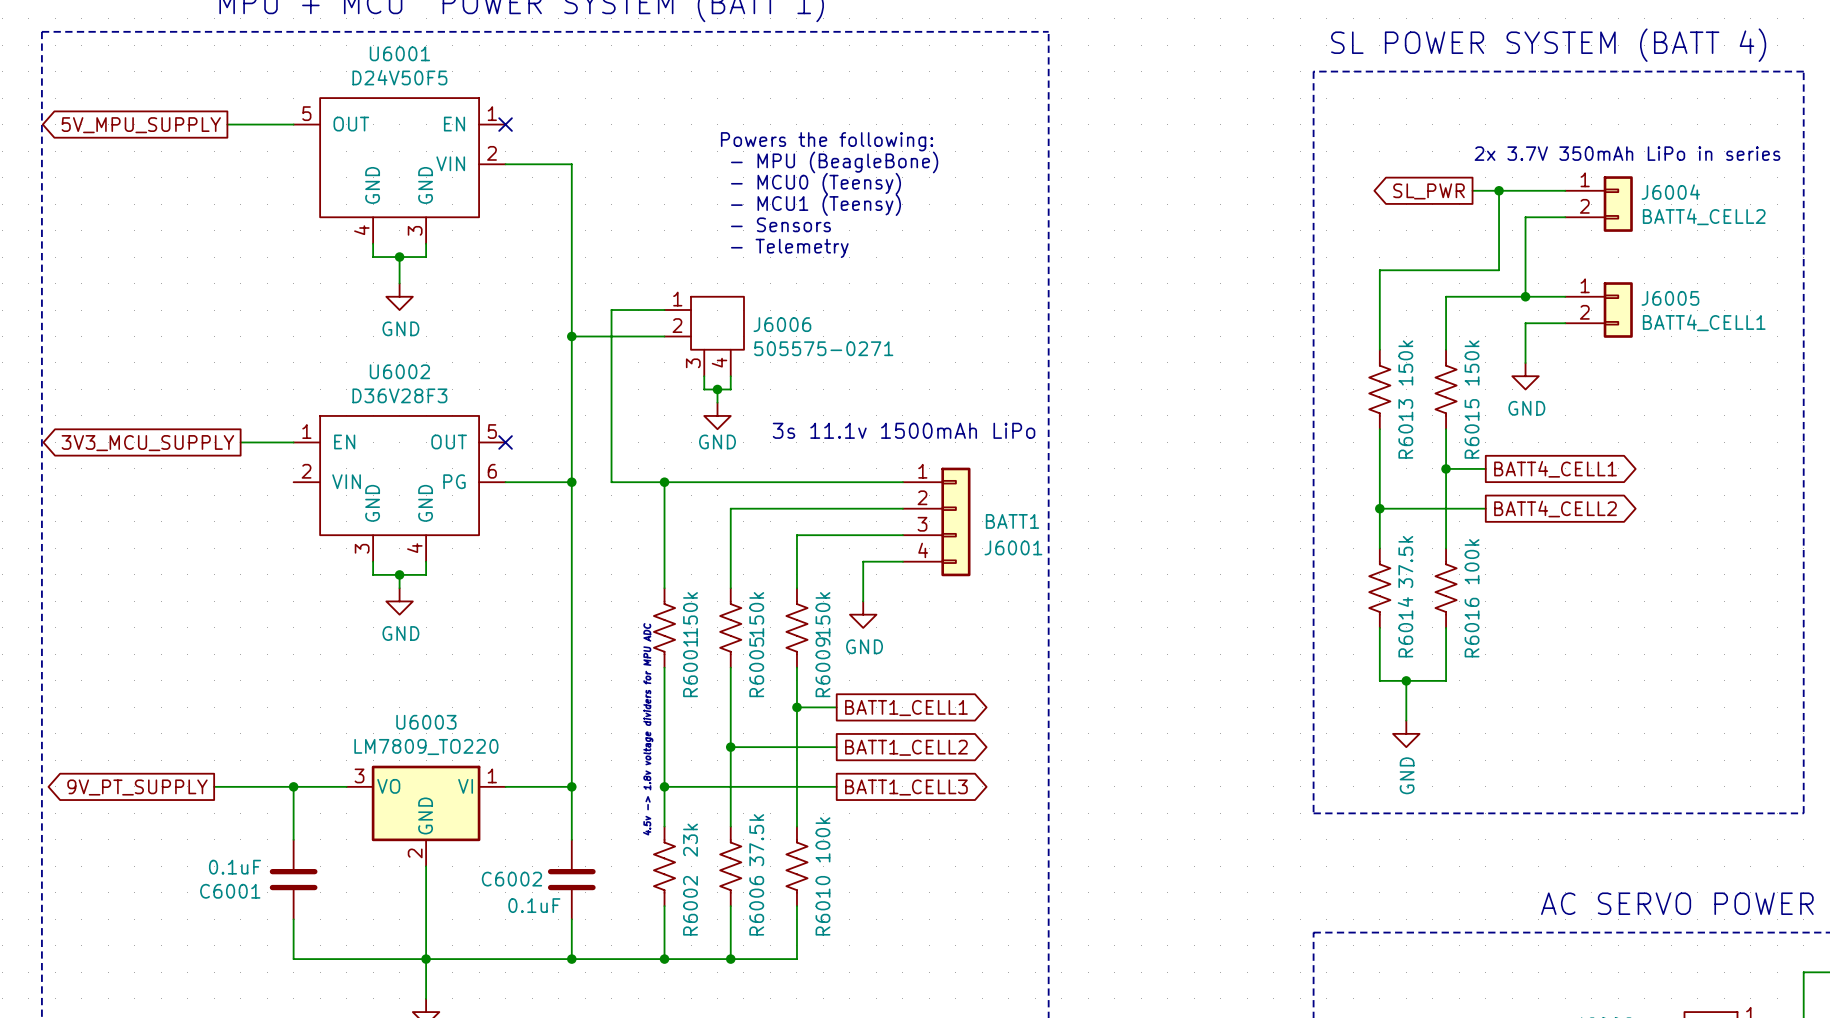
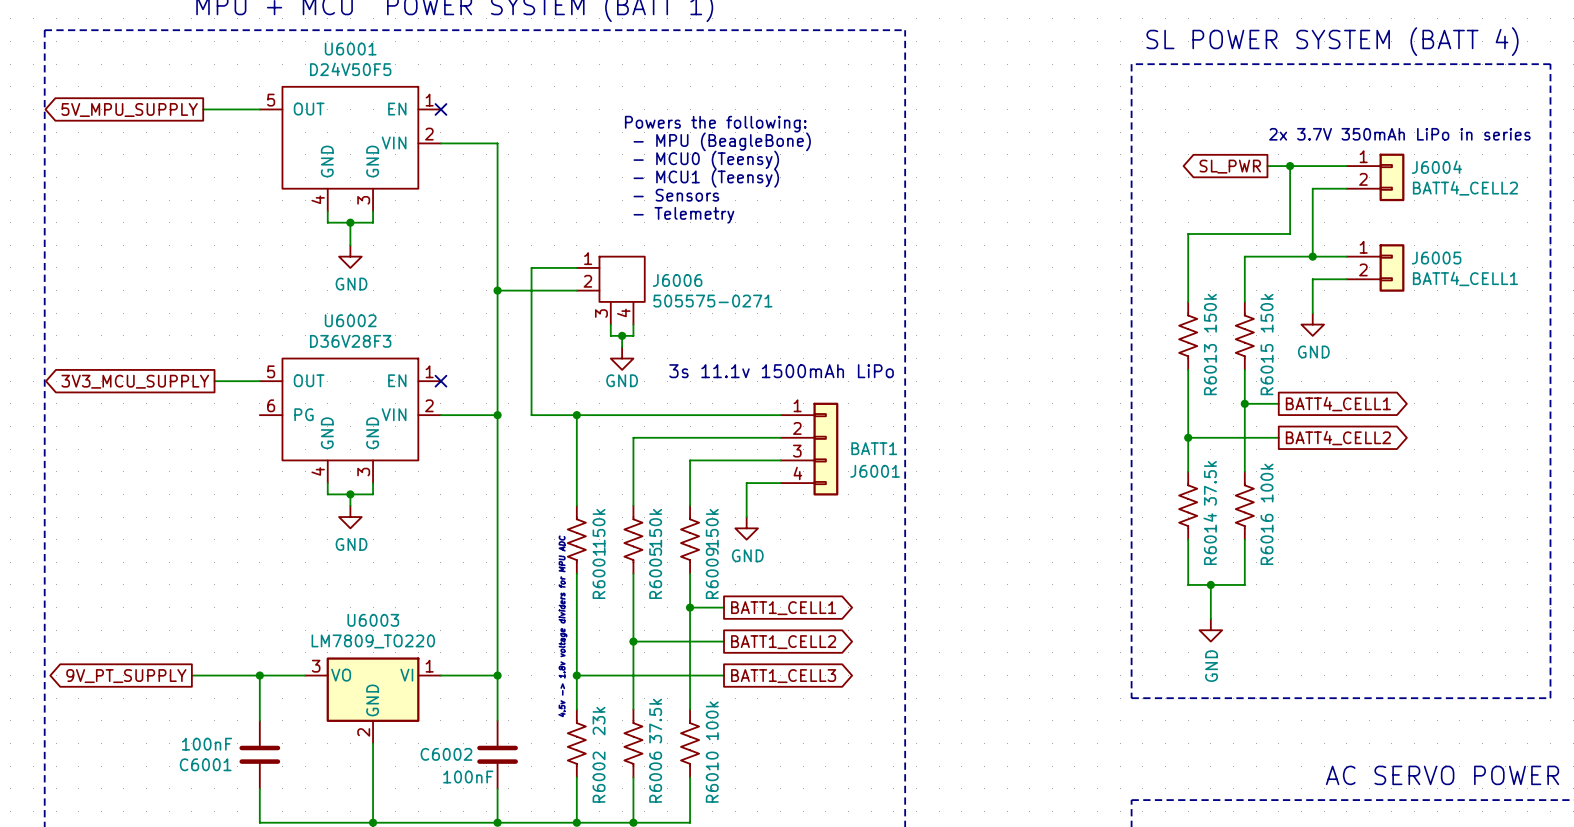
U6002 flip: as is (399, 475) -> left-right (350, 409)
C6001 value: 0.1uF (234, 867) -> 100nF (207, 744)
C6002 value: 0.1uF (534, 905) -> 100nF (468, 777)

